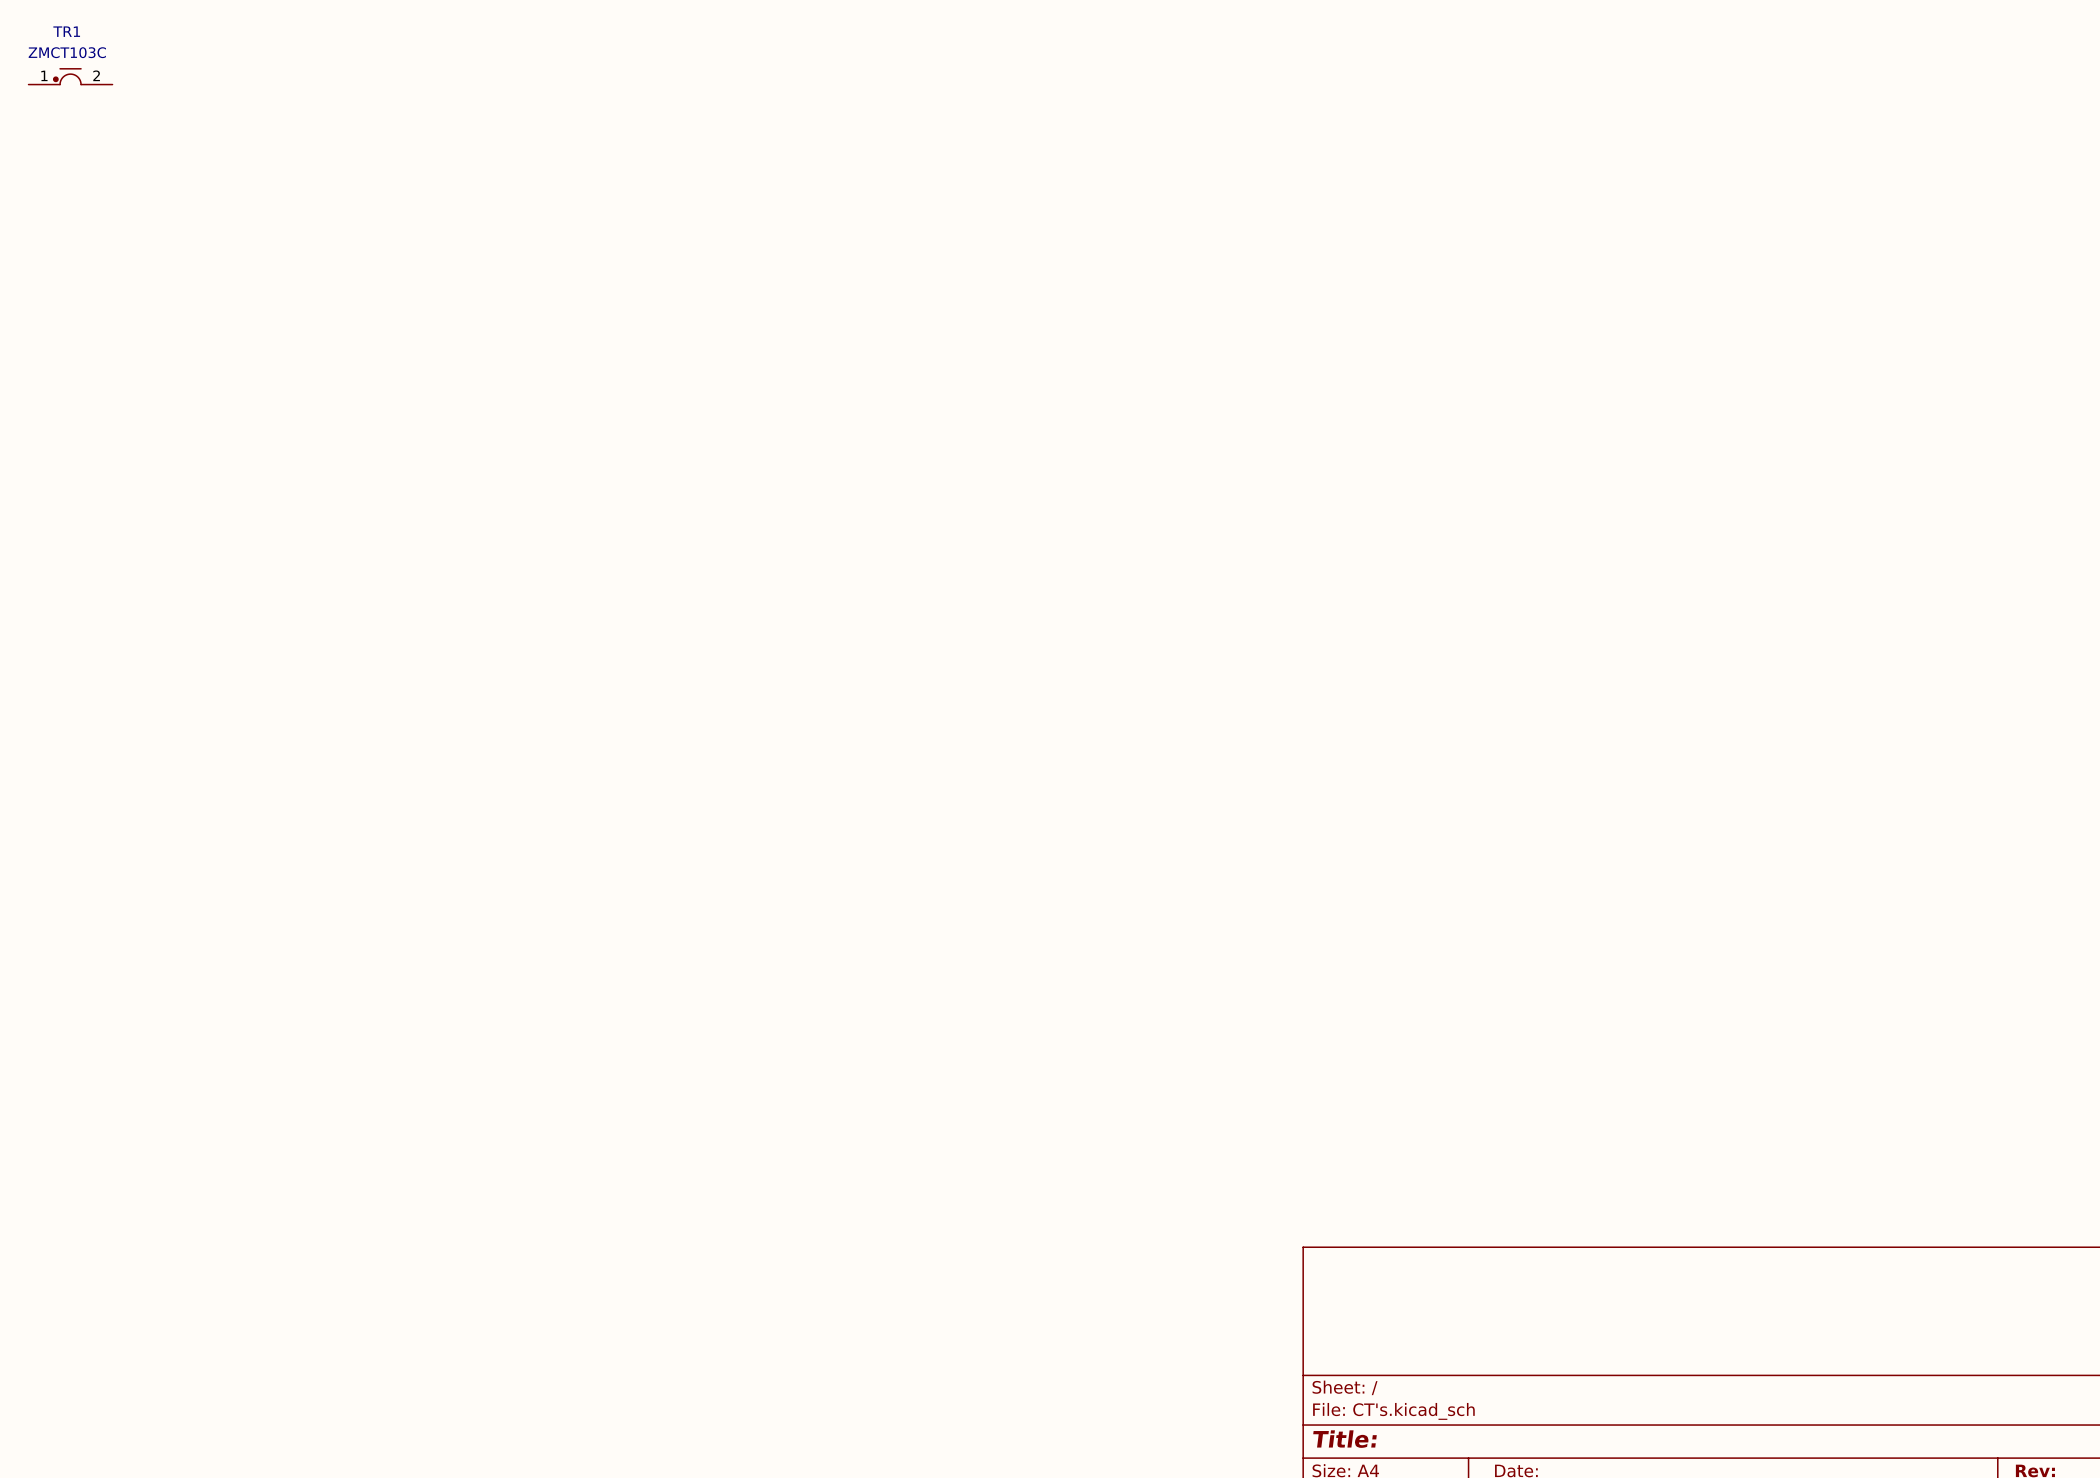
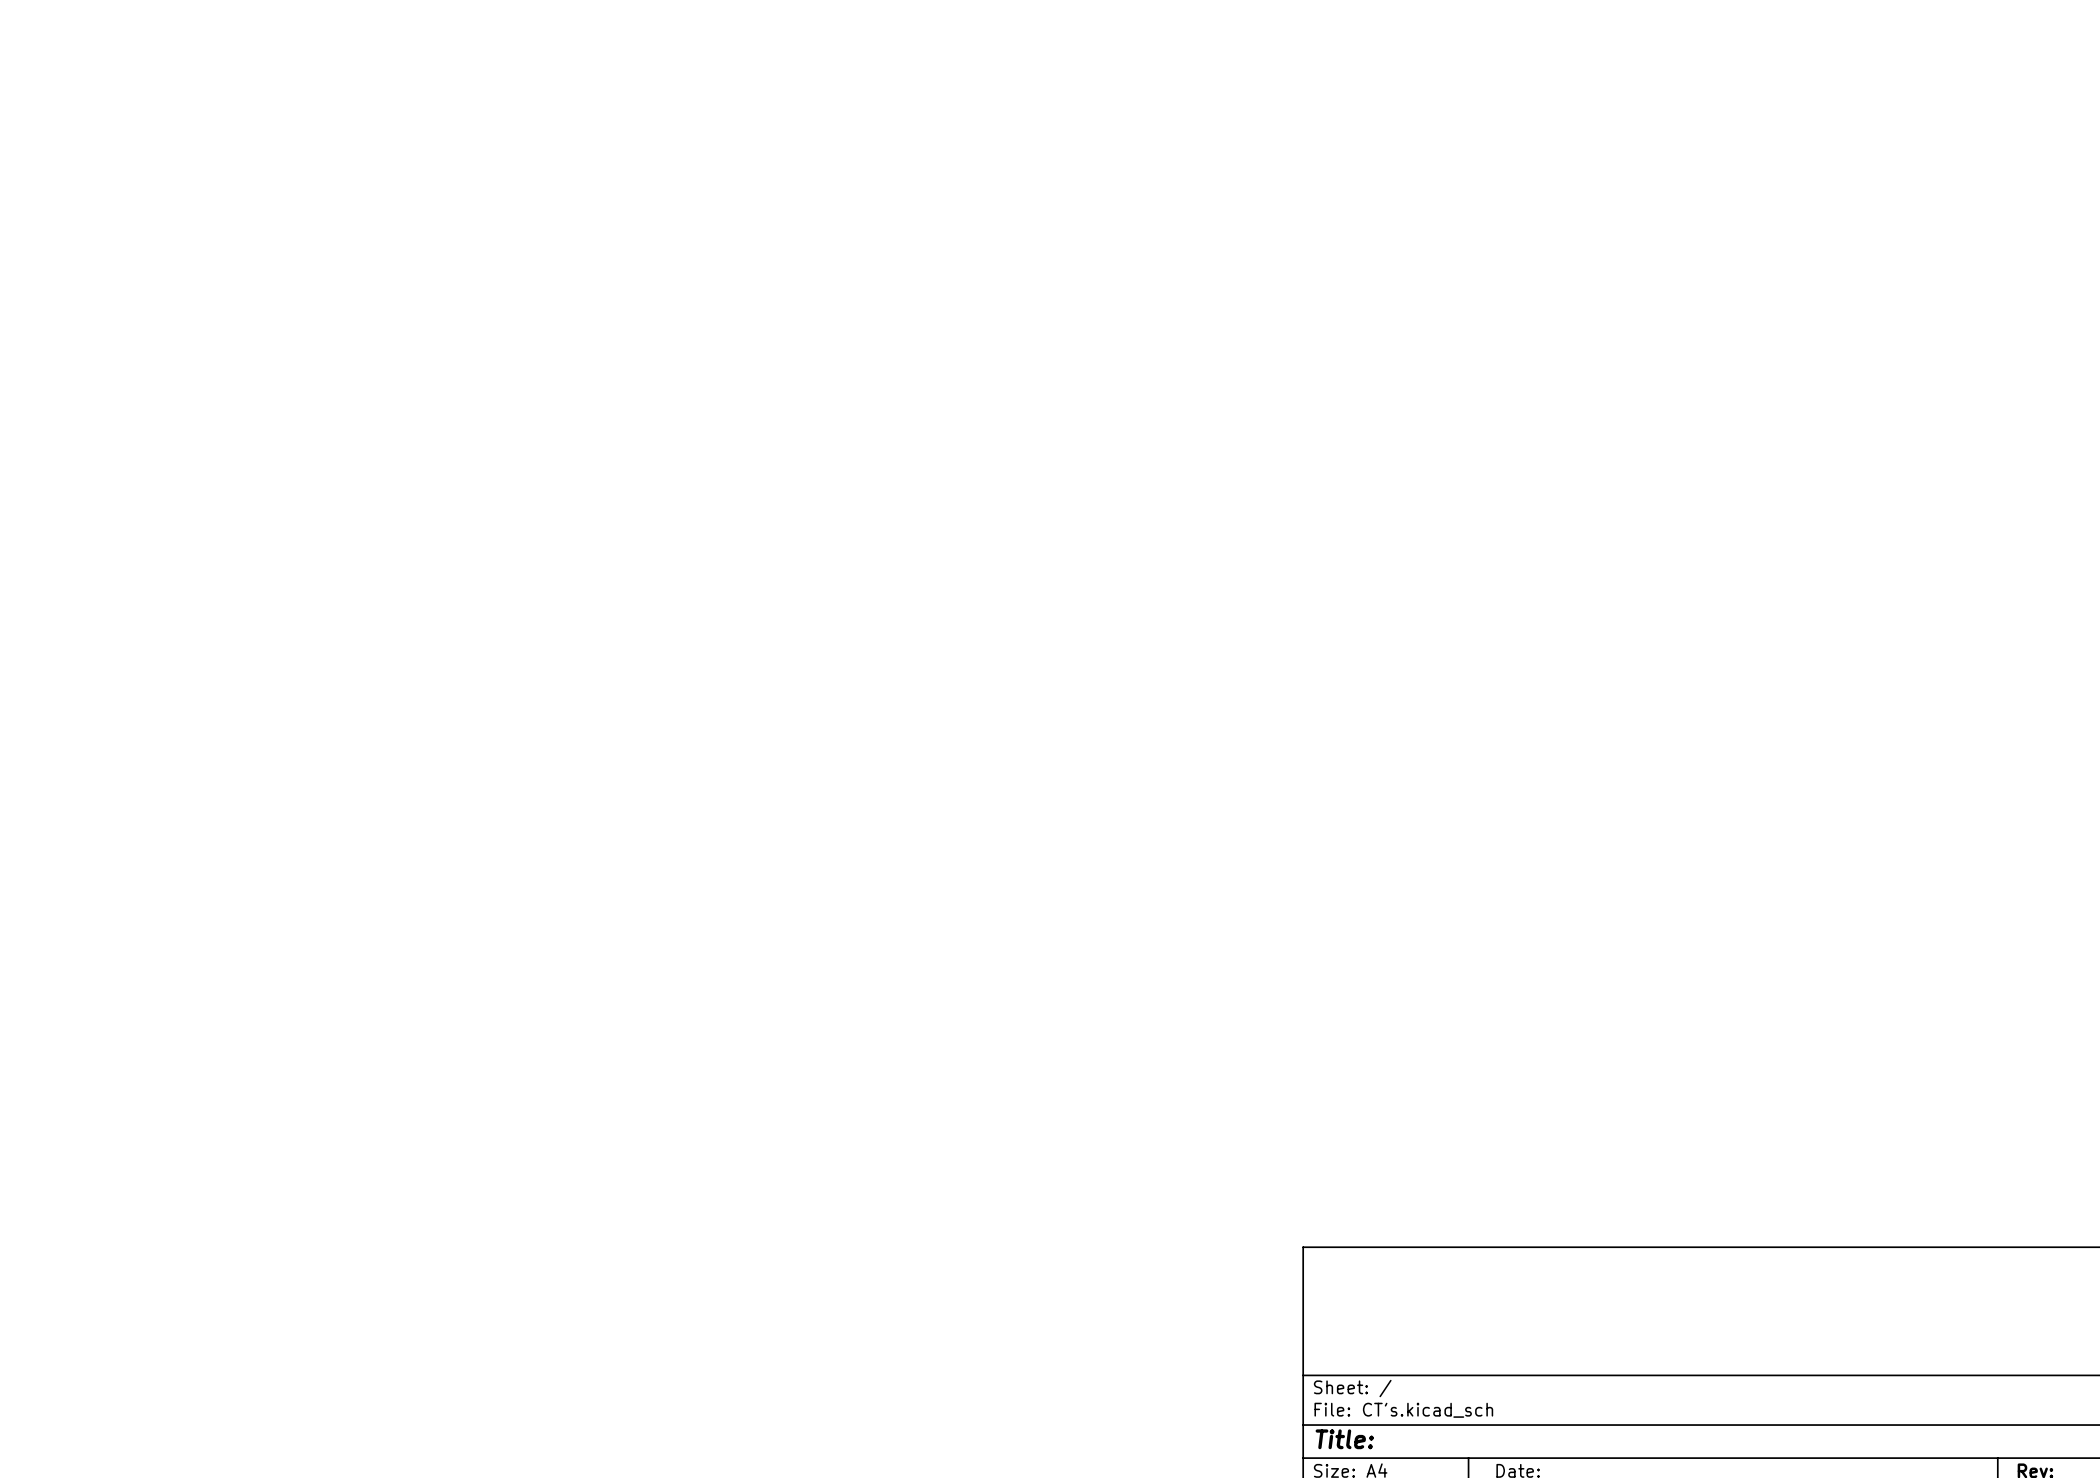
TR1: ZMCT103C (70, 76) -> none

